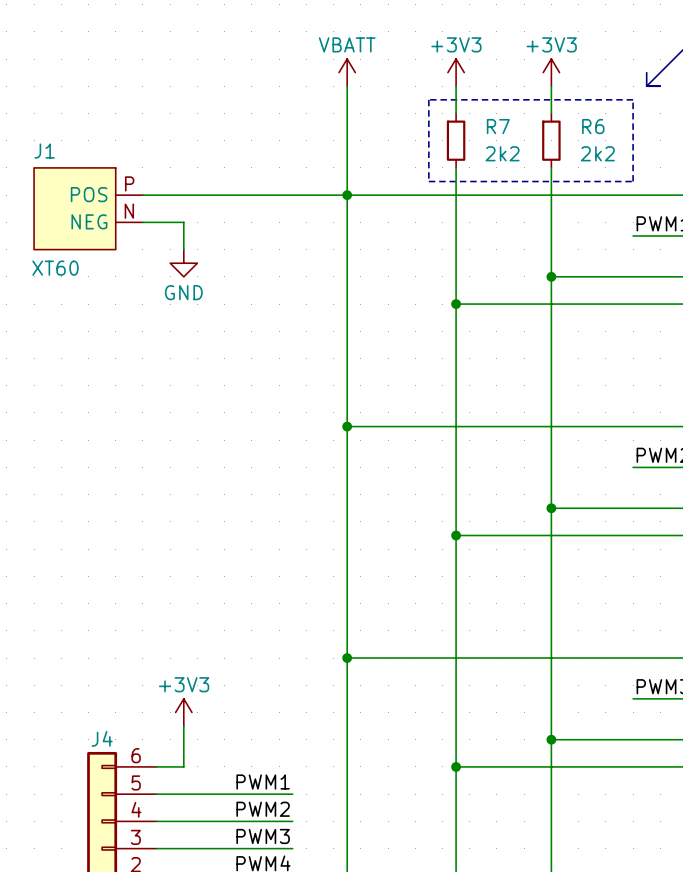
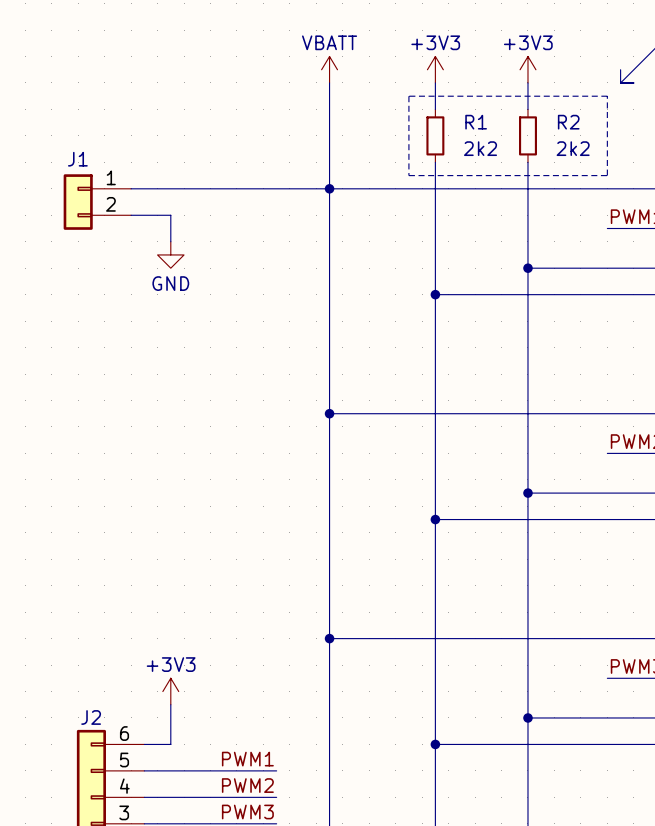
R7 name: R7 (498, 126) -> R1 (476, 122)
R6 name: R6 (593, 126) -> R2 (568, 122)
J1 name position: J1 (44, 151) -> J1 (77, 159)
J1 symbol: [34, 167, 143, 250] -> [63, 174, 132, 230]
J1 value: XT60 (55, 268) -> none
J4 name: J4 (102, 738) -> J2 (91, 717)

